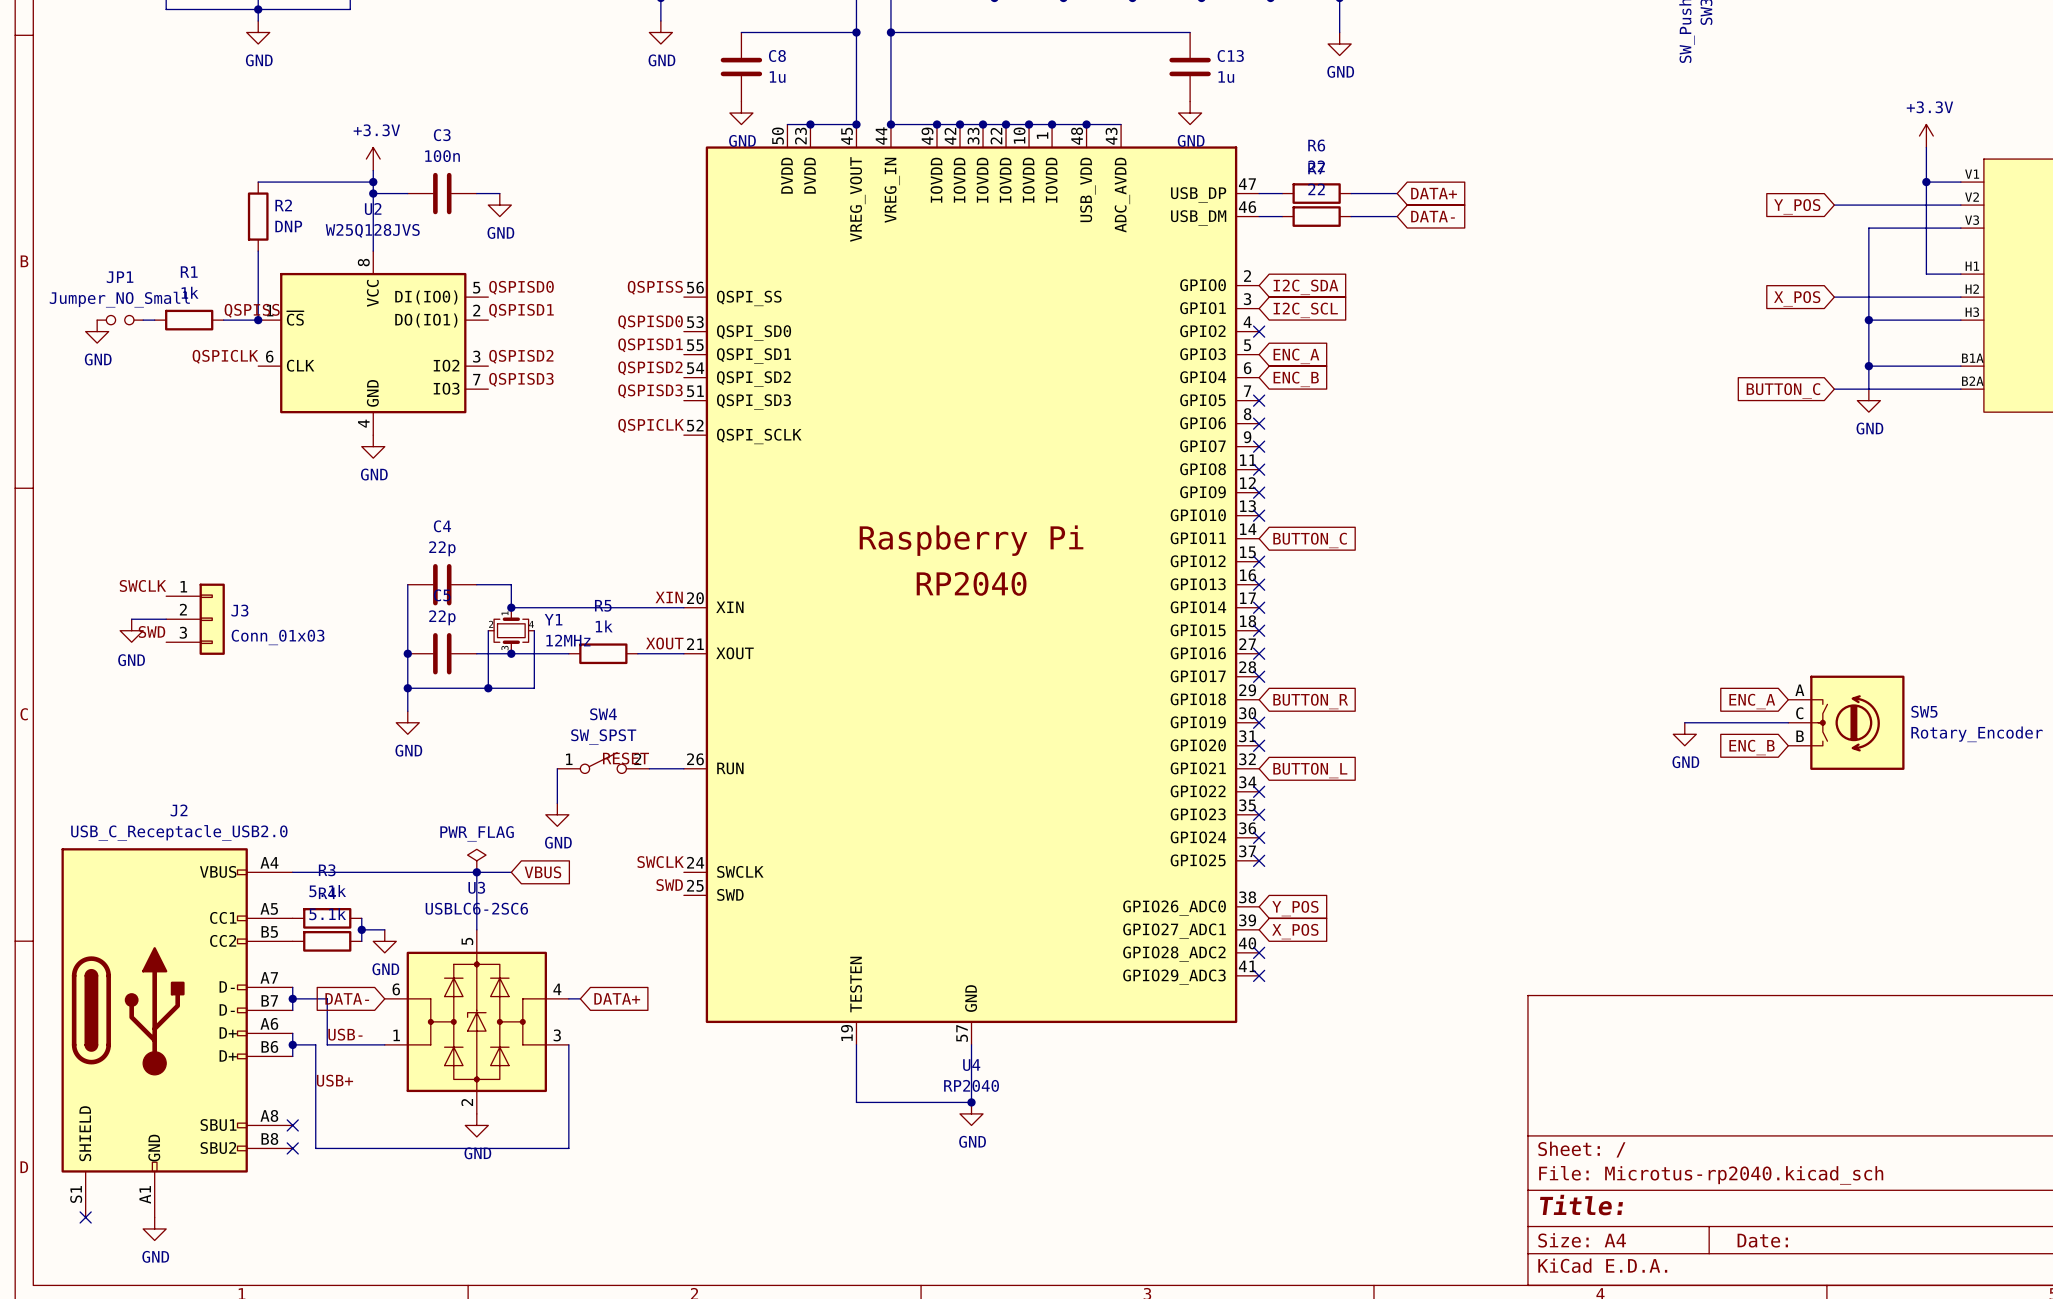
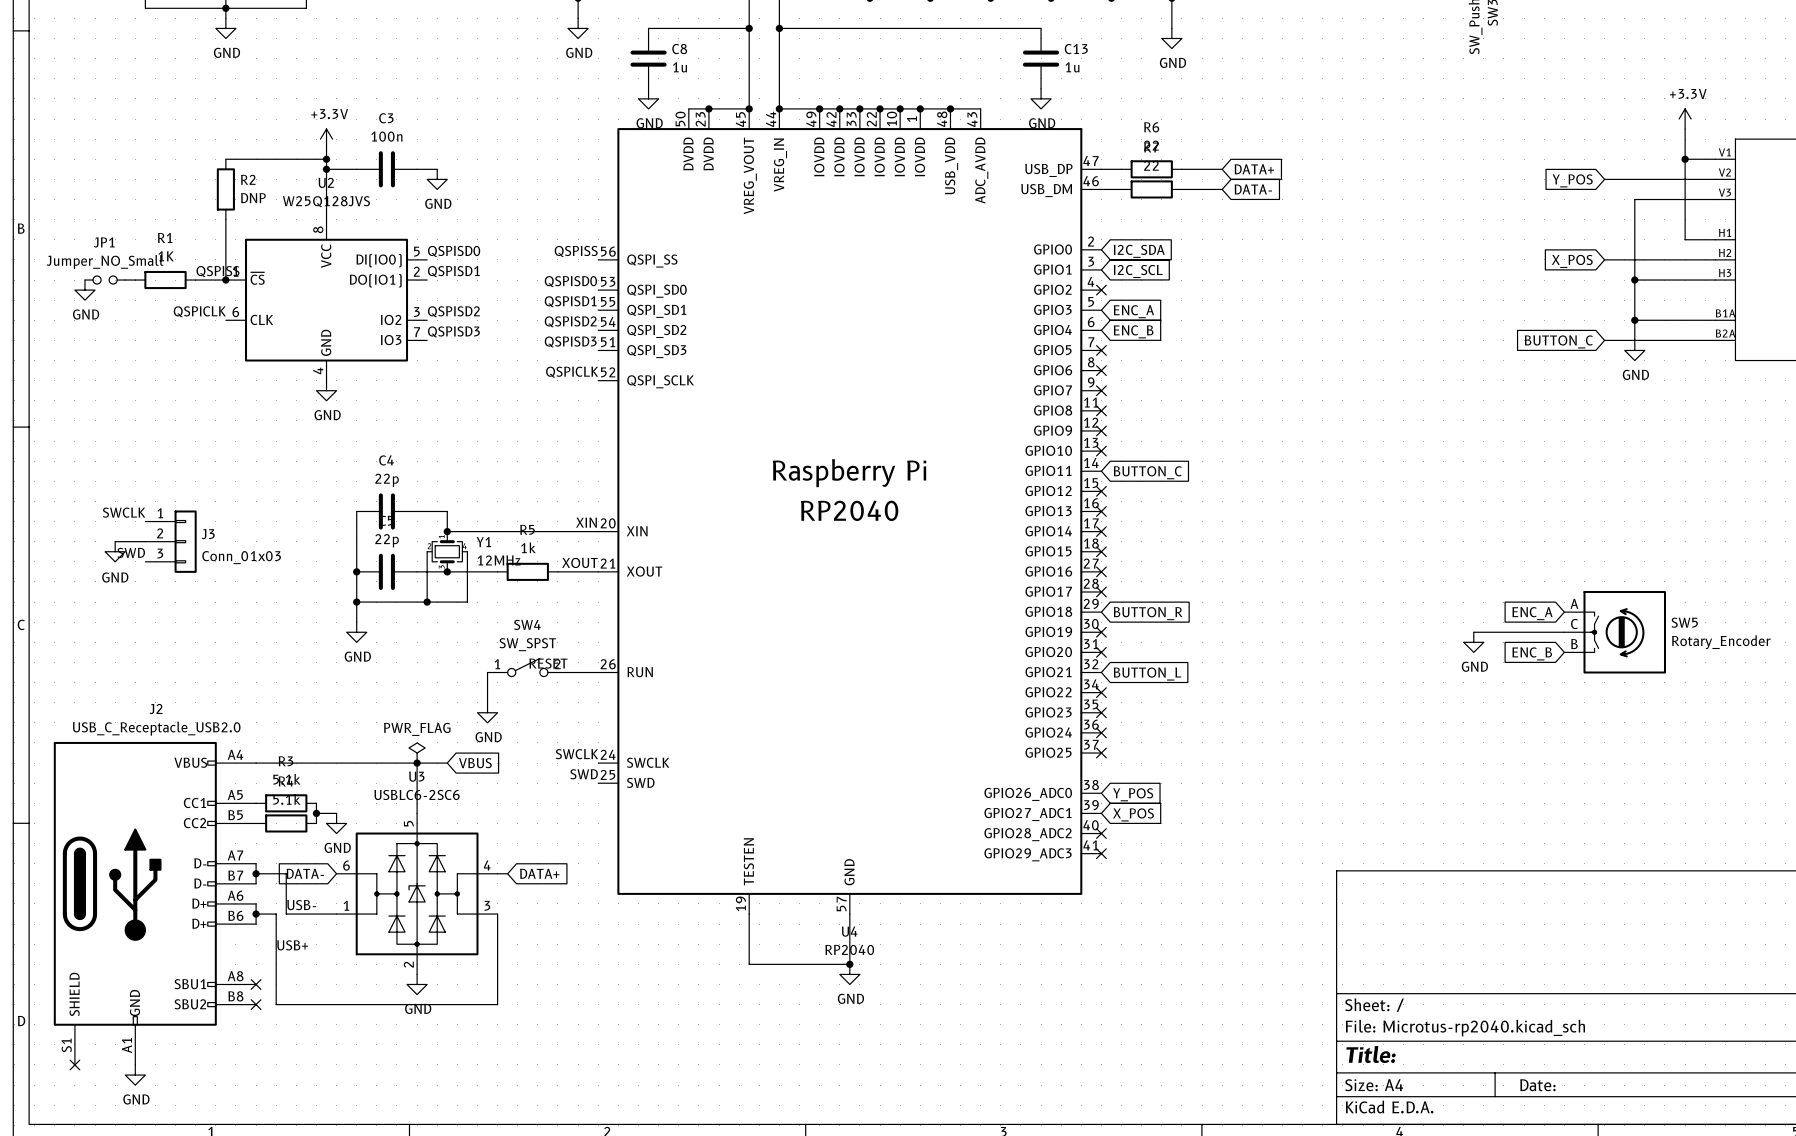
R1 value: 1k (190, 292) -> 1K (166, 256)

